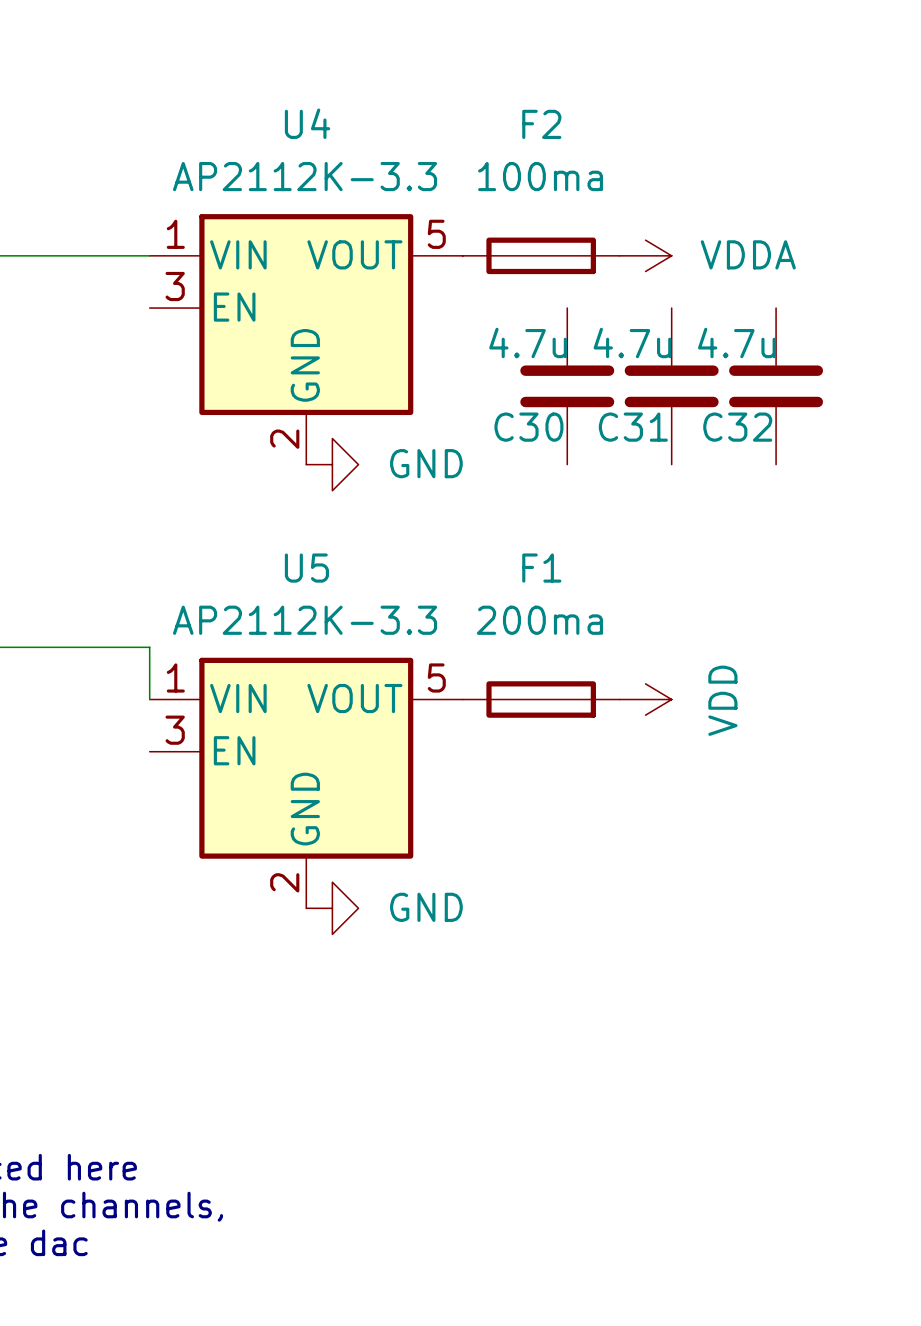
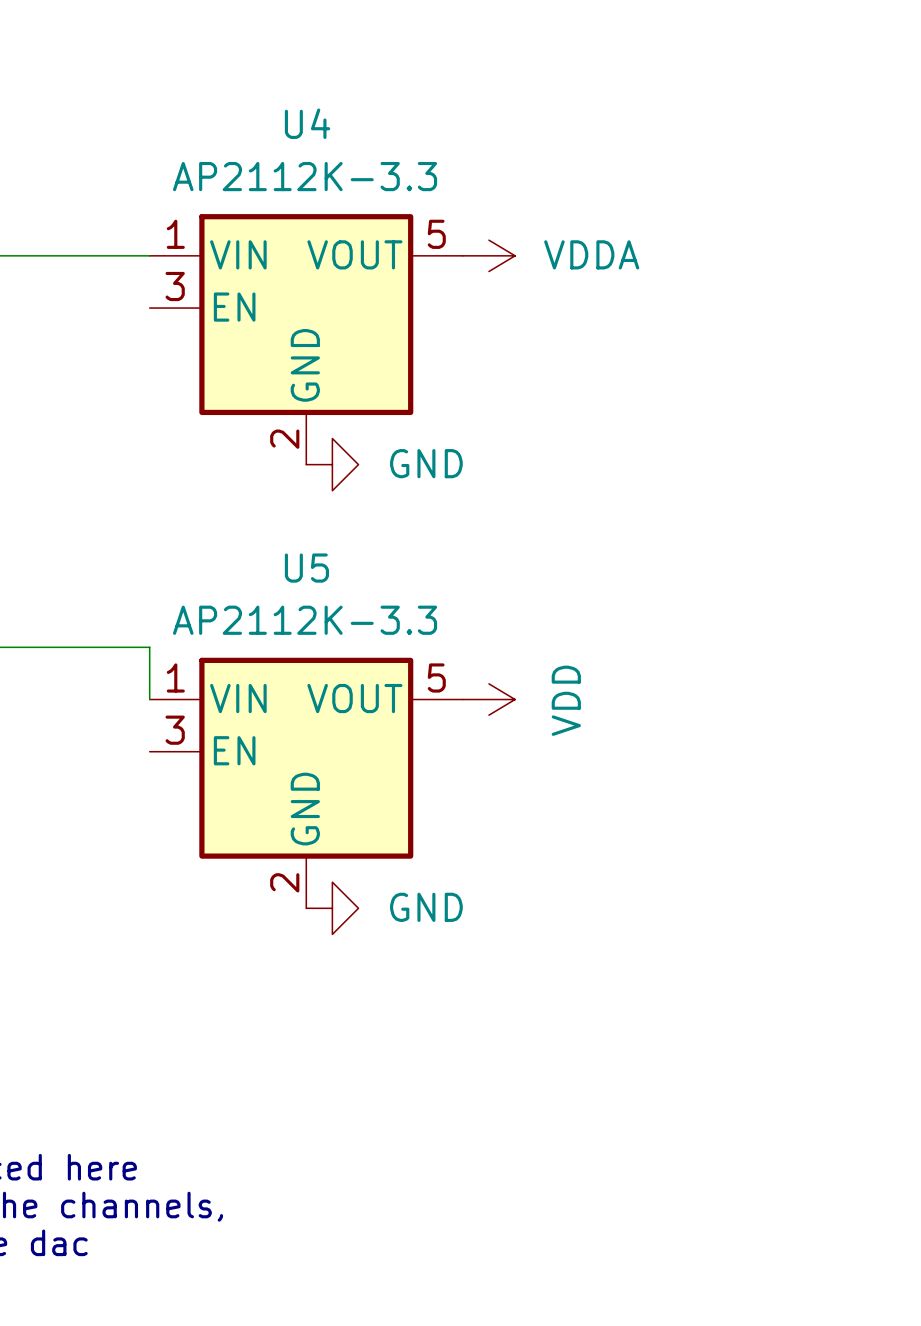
F2: 100ma (541, 255) -> none
power symbol position: VDDA (645, 255) -> VDDA (488, 255)
C30: 4.7u (567, 386) -> none
C31: 4.7u (671, 386) -> none
C32: 4.7u (776, 386) -> none
F1: 200ma (541, 699) -> none
power symbol position: VDD (645, 699) -> VDD (488, 699)

